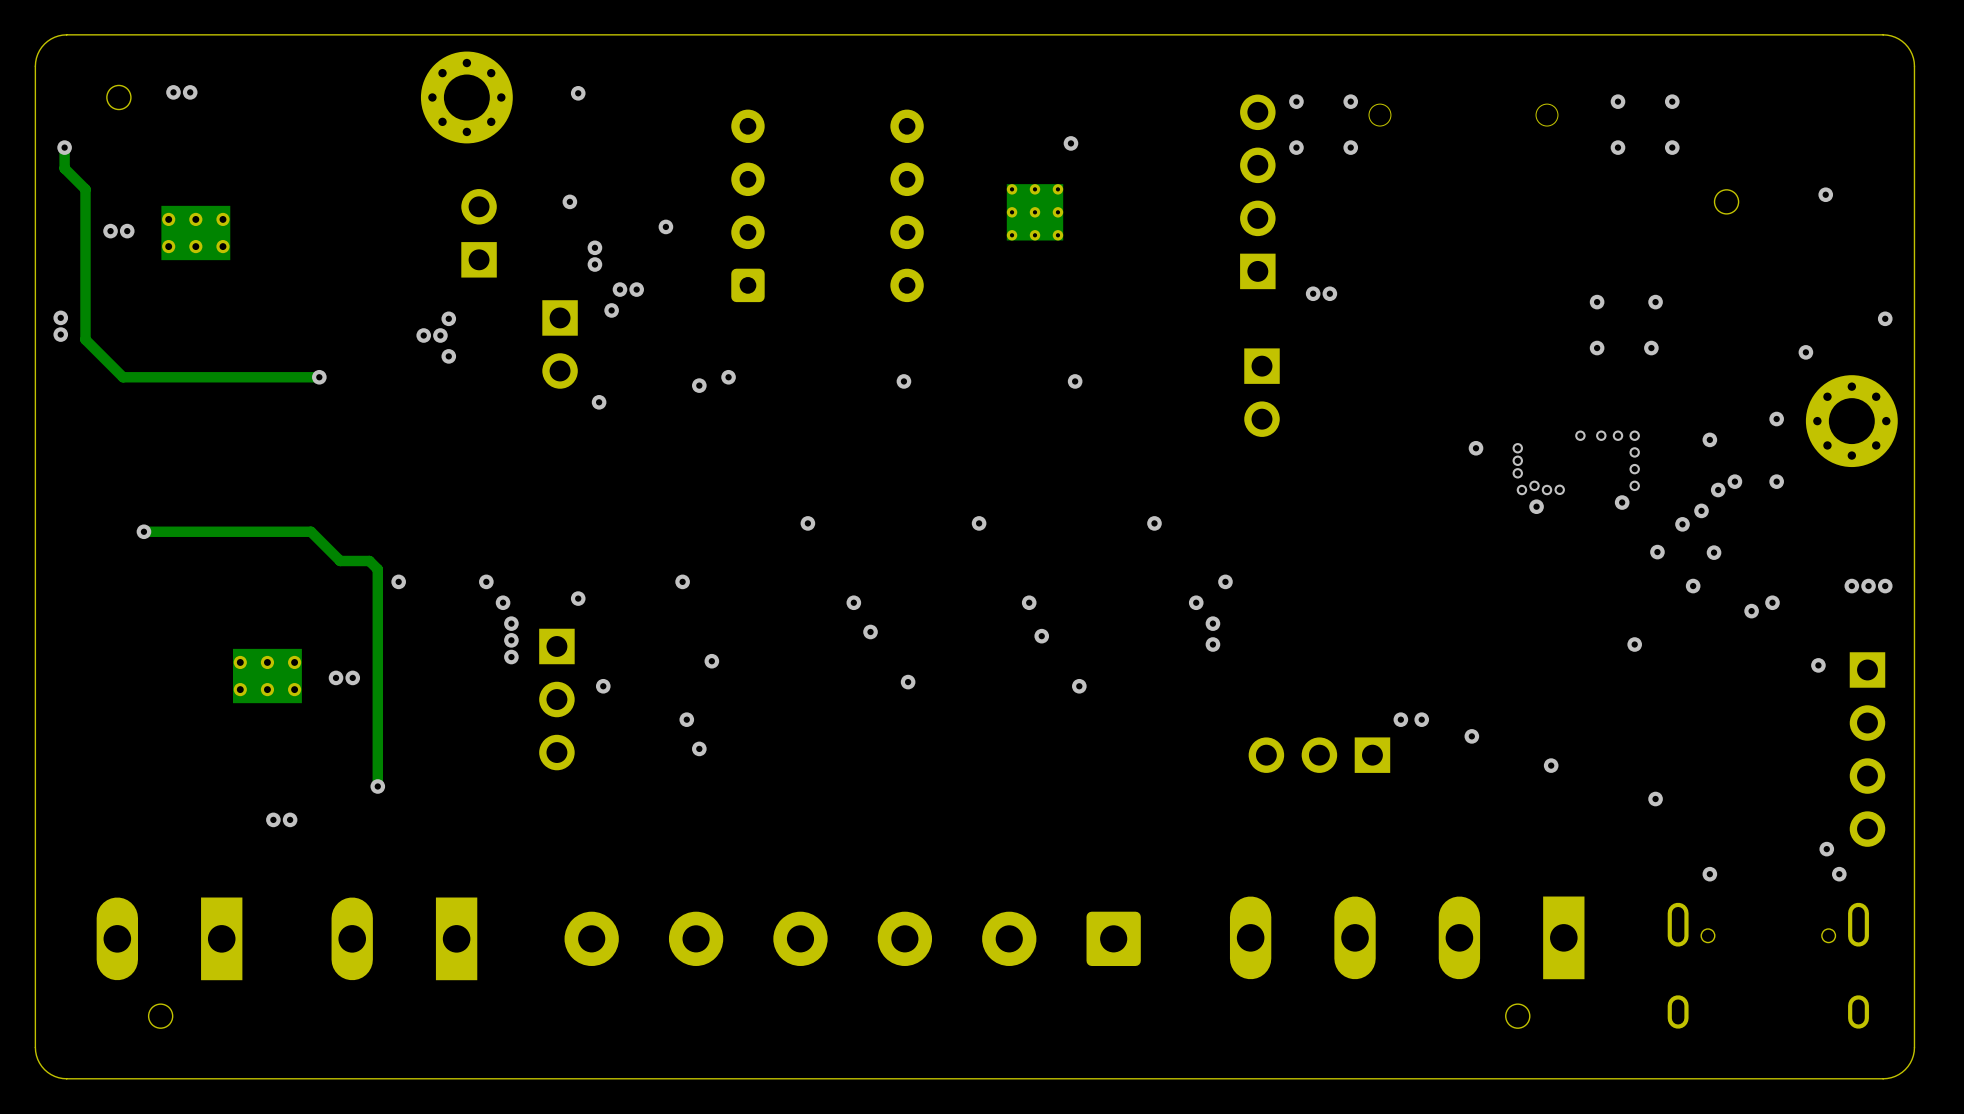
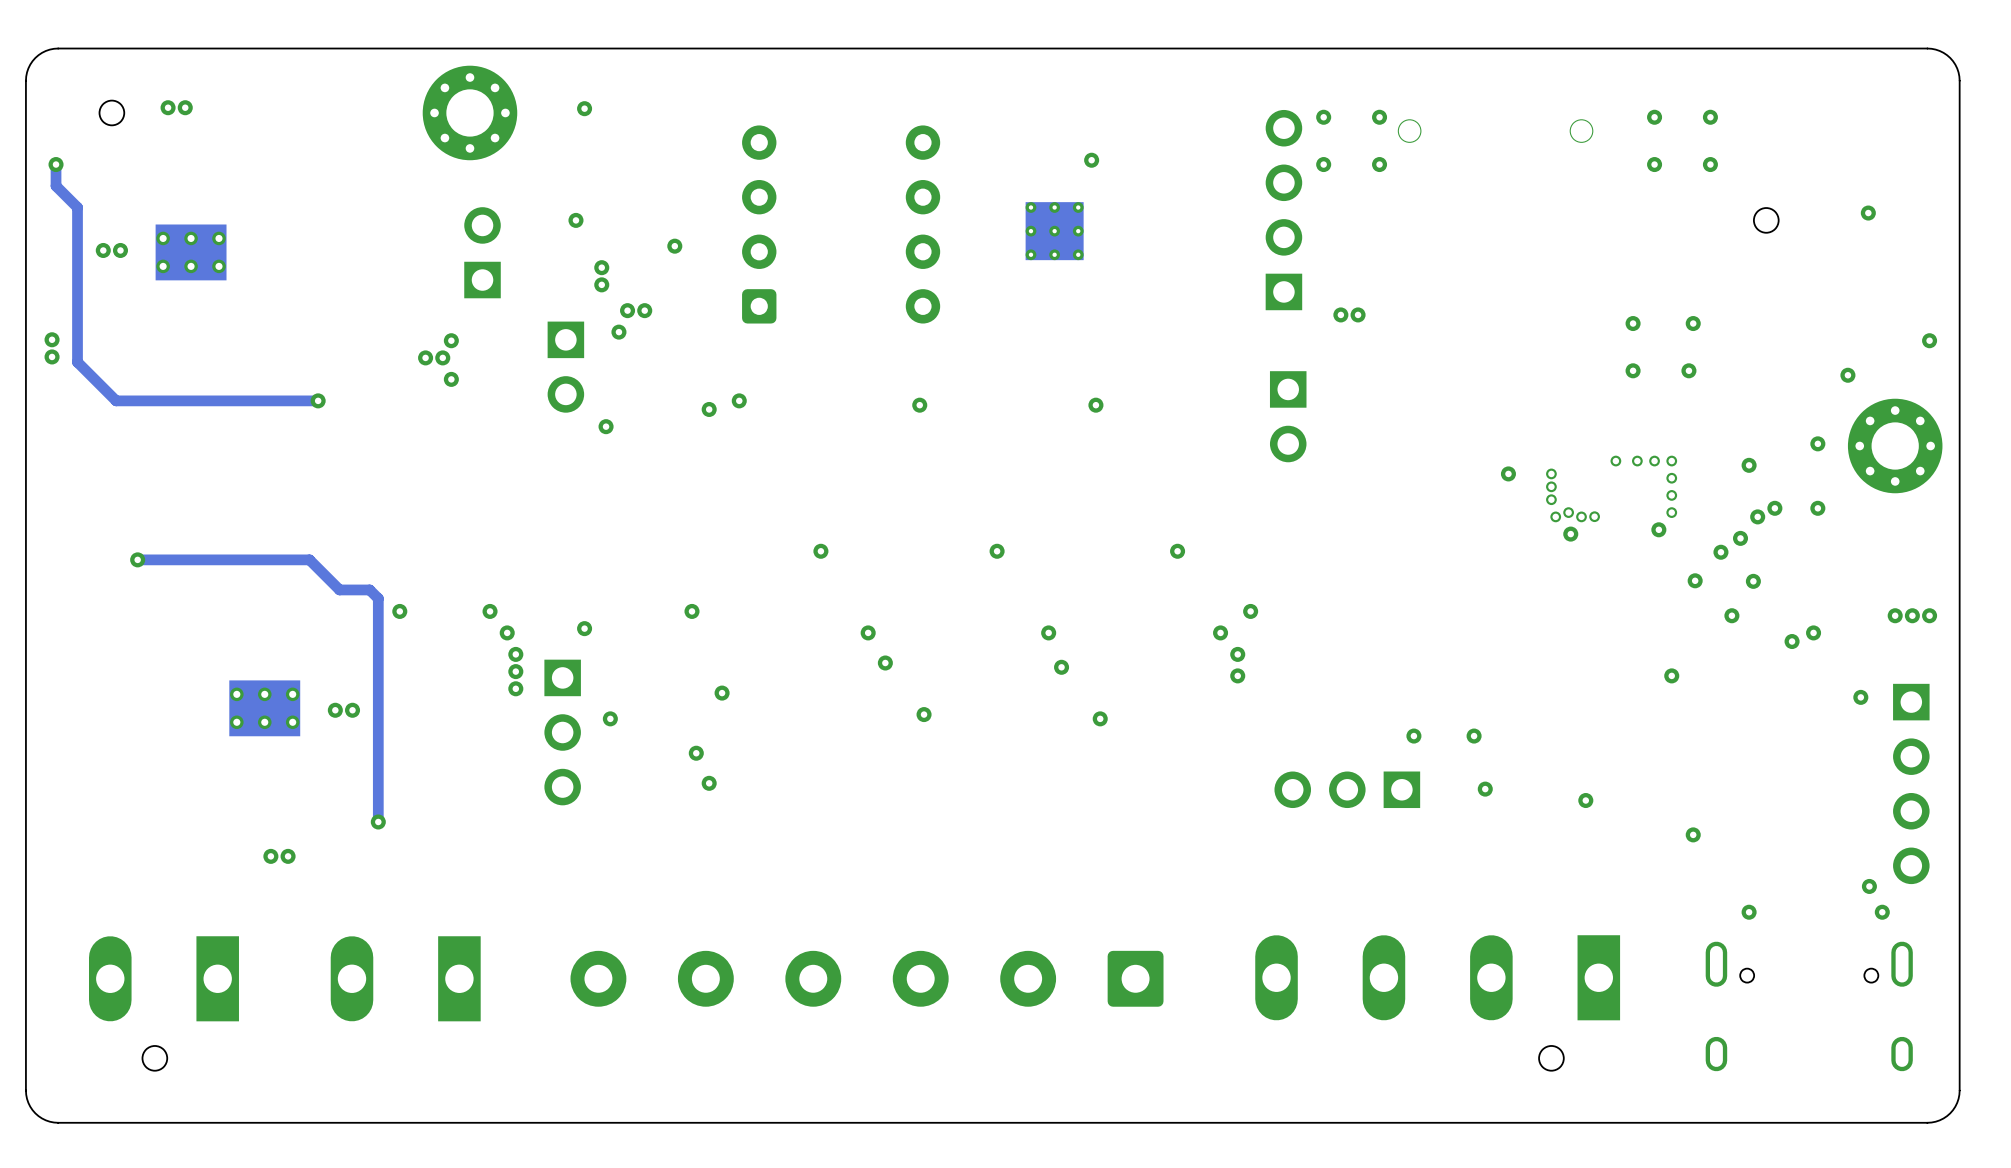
via: none -> (1413, 736)
via: none -> (1474, 736)
via: (1400, 719) -> none
via: (1421, 719) -> none
via: (1471, 736) -> none
via: none -> (1485, 789)

